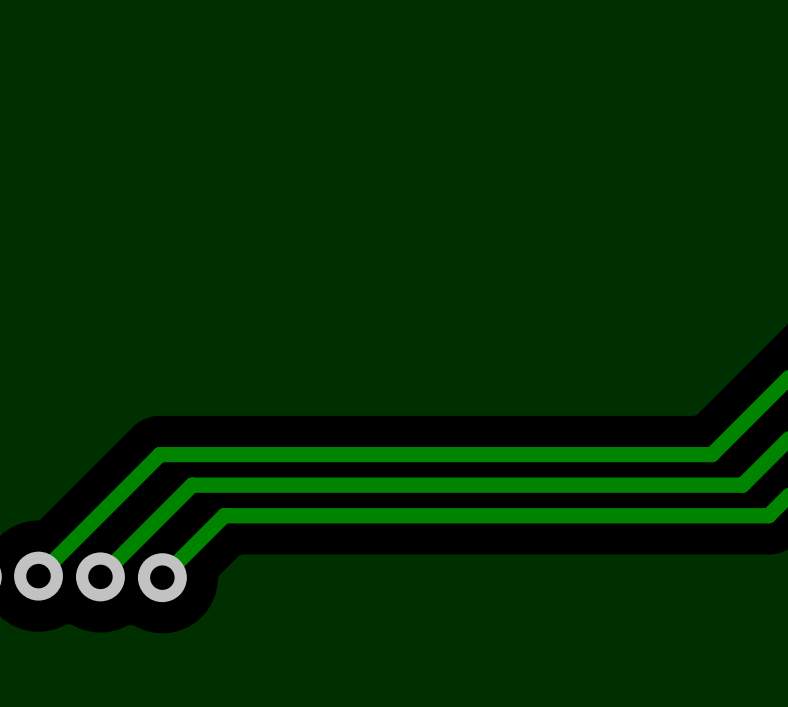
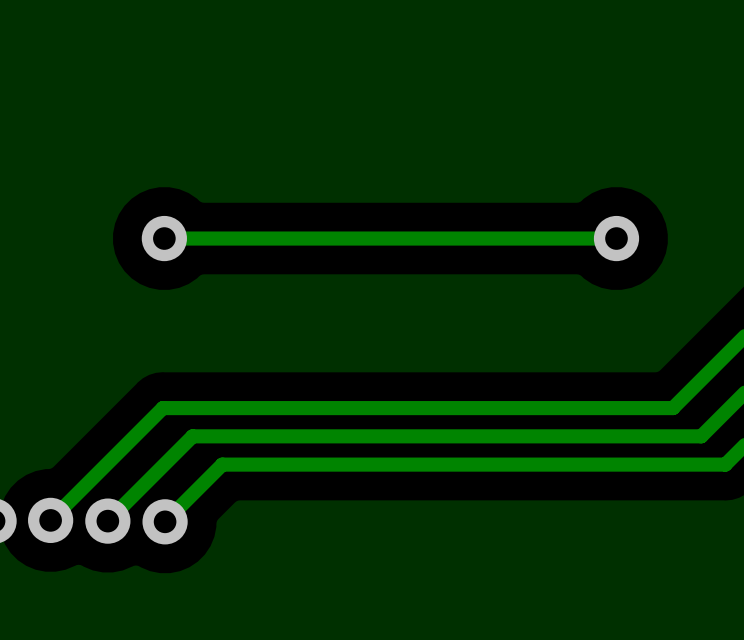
via: none -> (164, 238)
track: none -> (616, 238) (164, 238)
via: none -> (616, 238)

